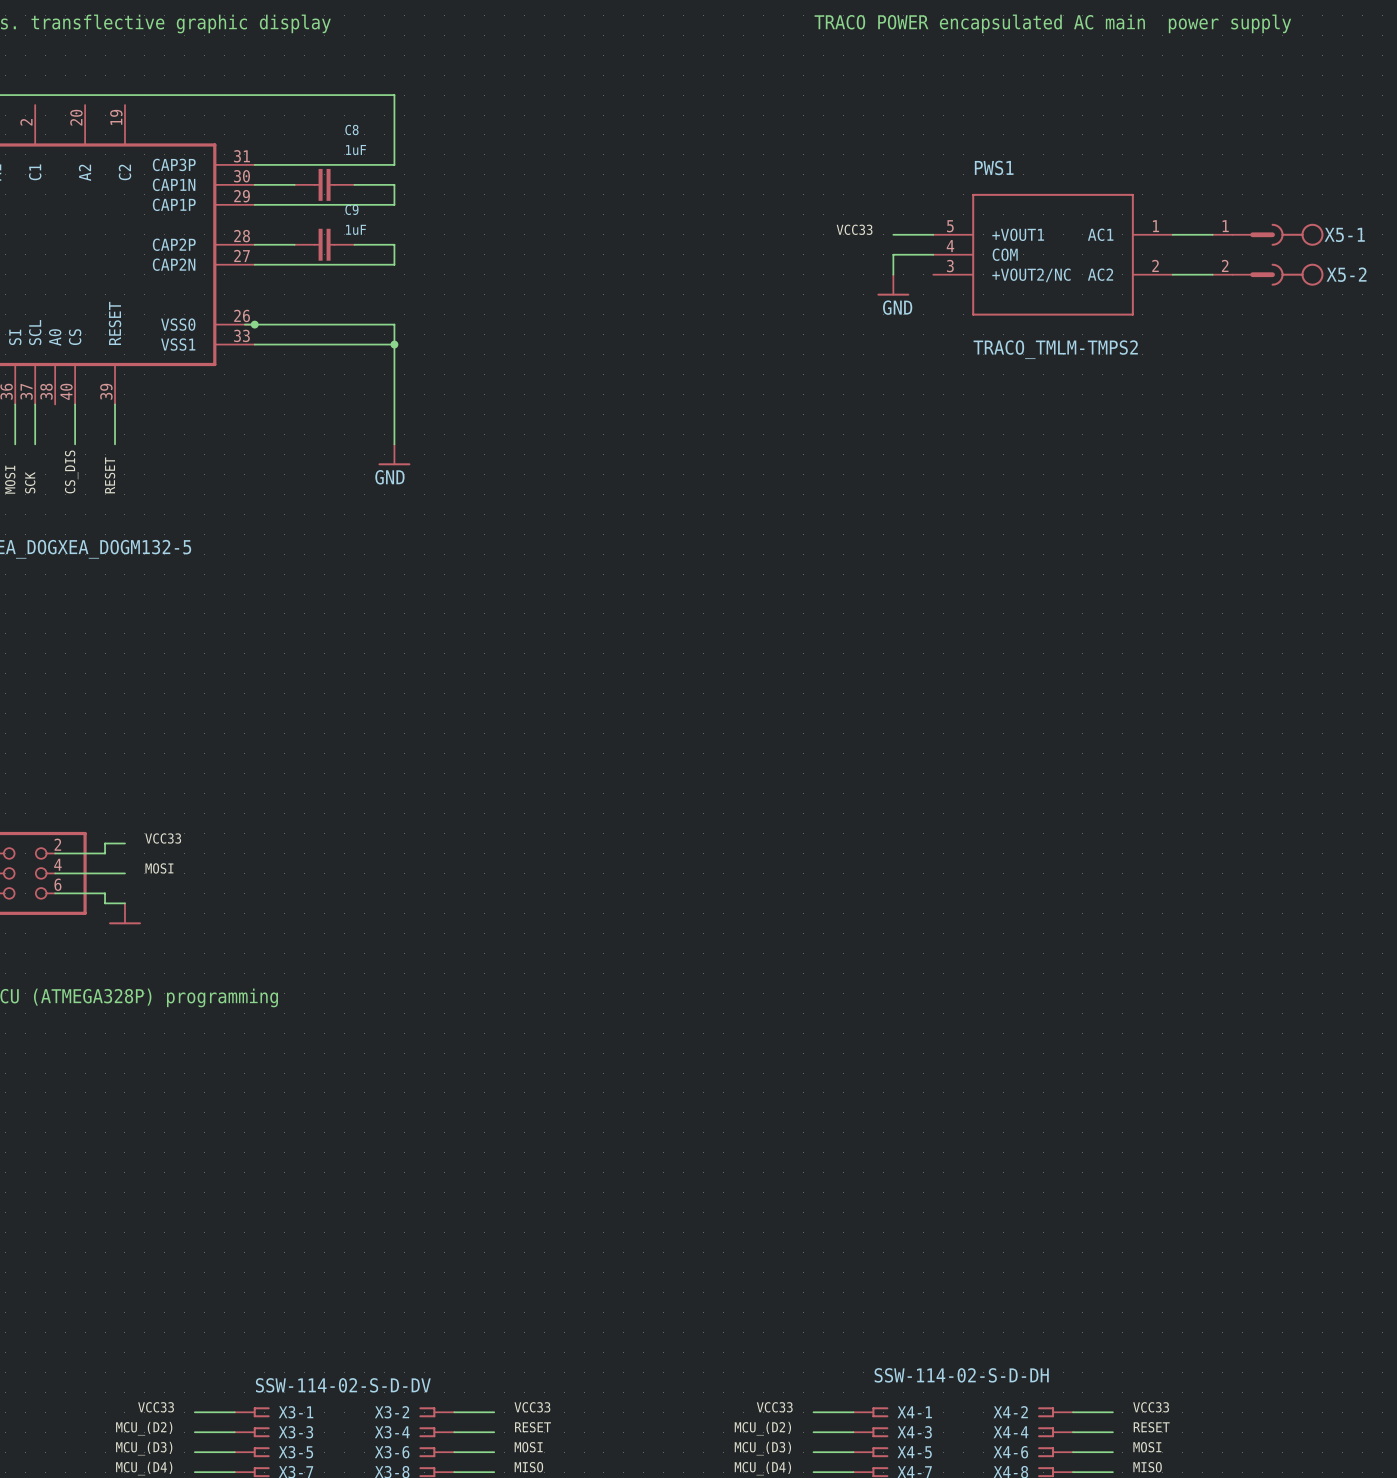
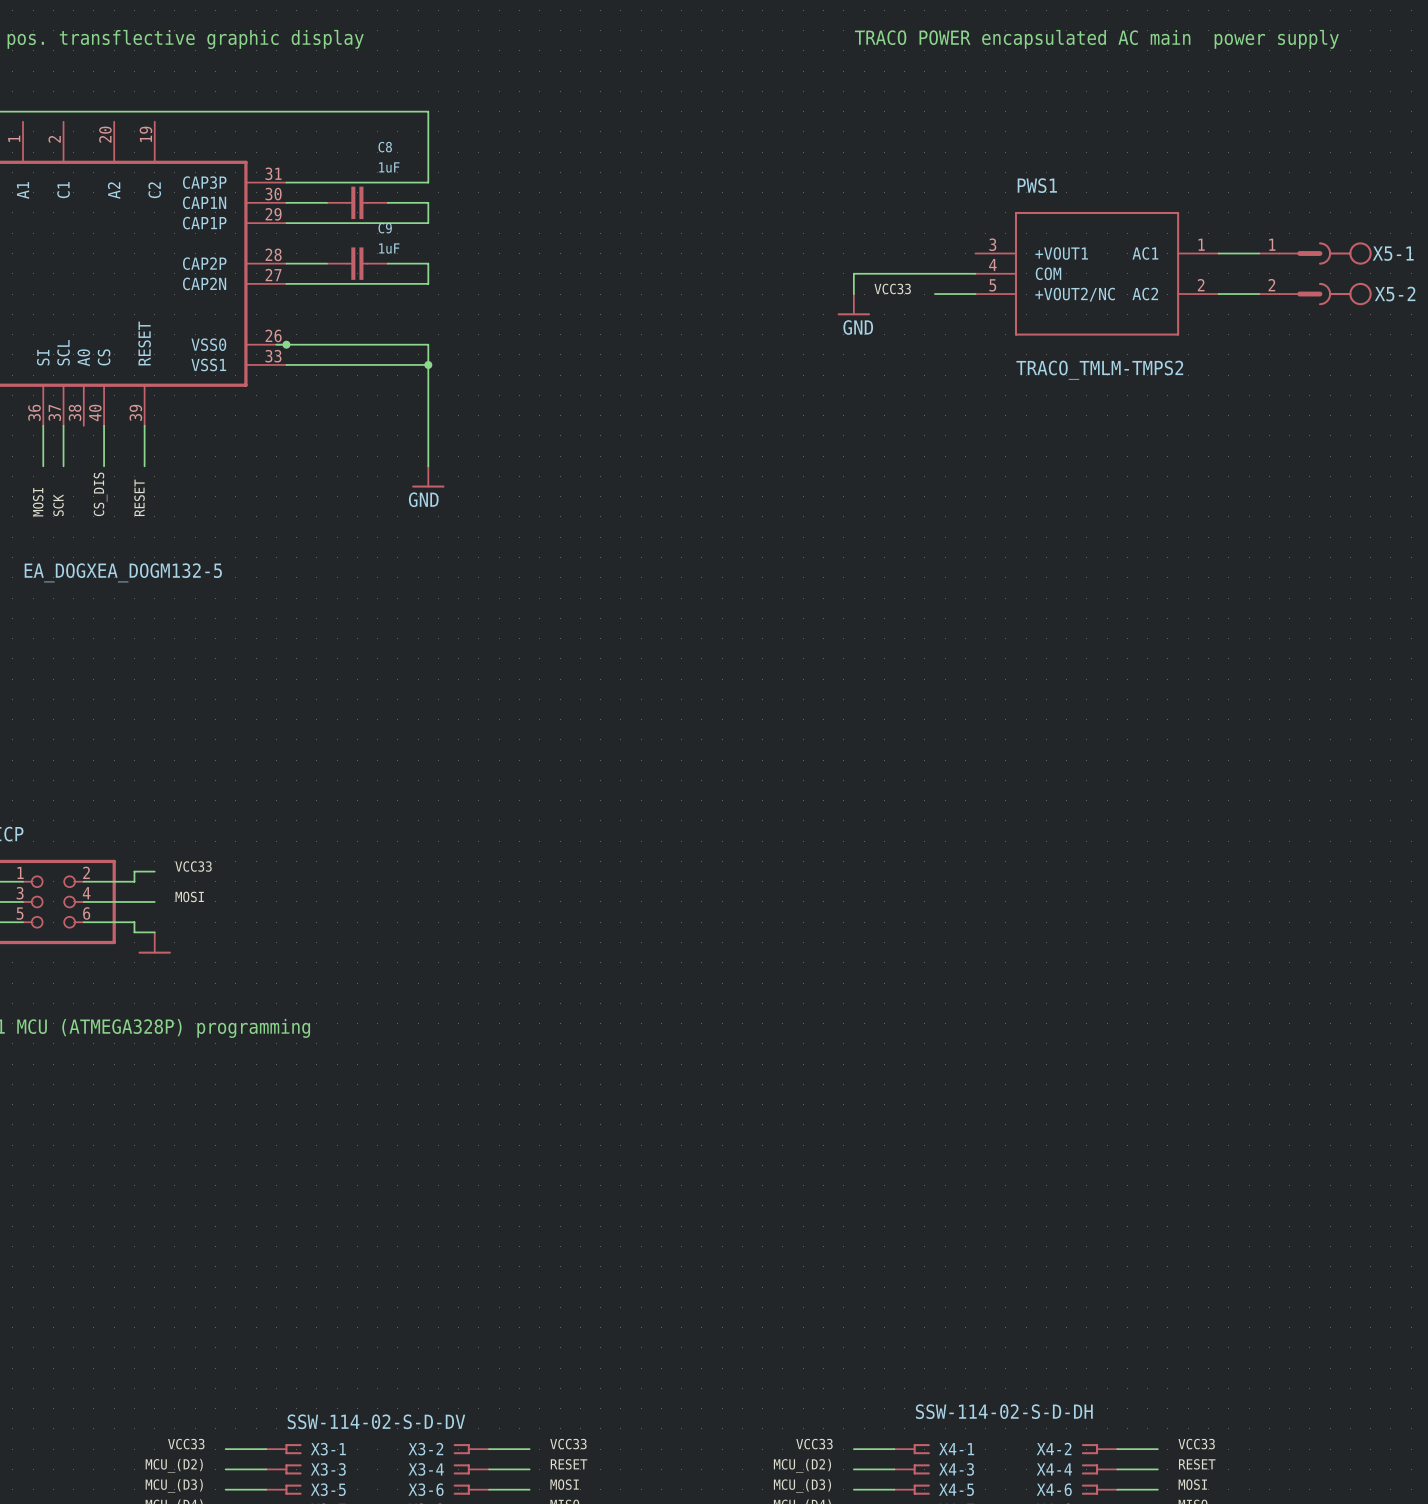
PWS1 pin number: 5 (950, 226) -> 3 (992, 244)
label position: VCC33 (854, 229) -> VCC33 (892, 288)
wire: (893, 234) (933, 234) -> none
wire: (893, 254) (893, 274) -> (975, 294) (934, 294)
wire: none -> (934, 273) (853, 273) (853, 294)
PWS1 pin number: 3 (950, 266) -> 5 (992, 285)
power symbol position: GND (893, 285) -> GND (853, 304)

